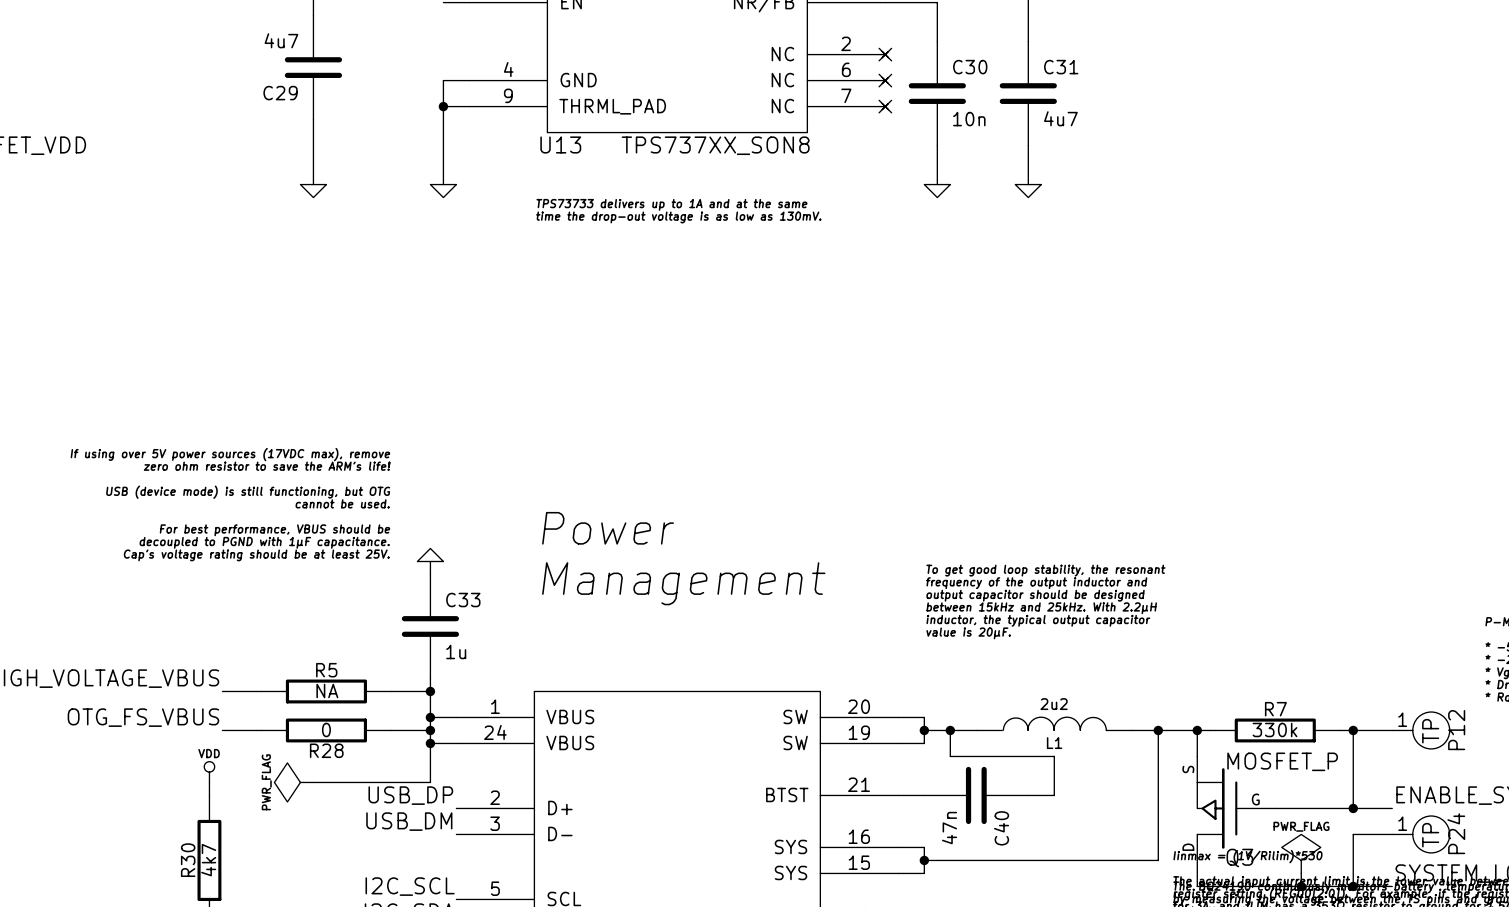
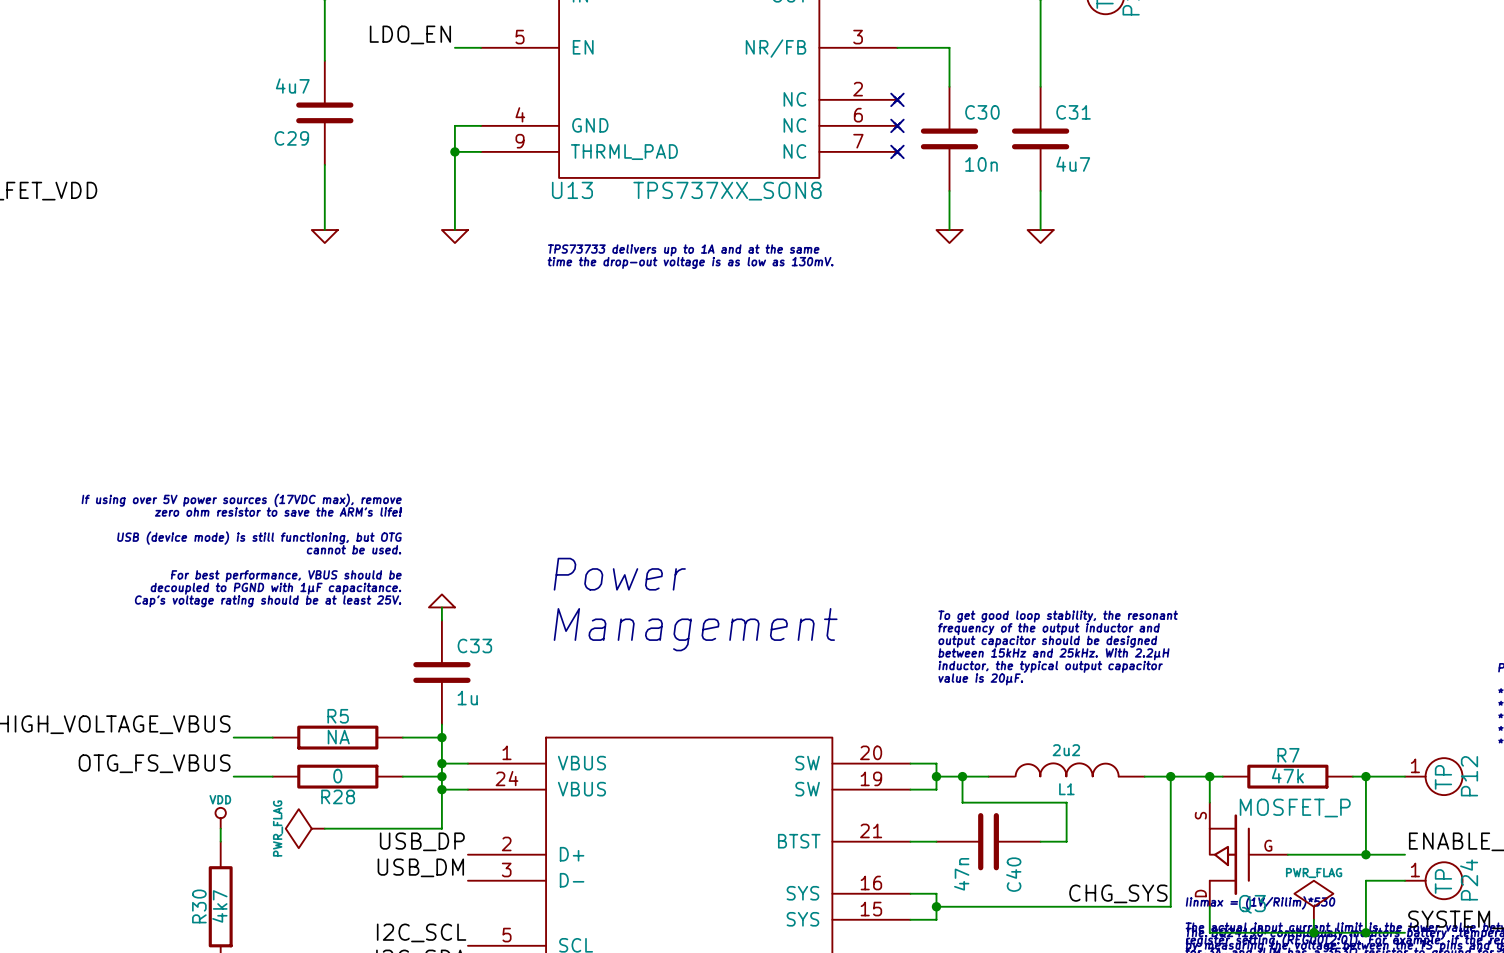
R7 value: 330k (1274, 729) -> 47k (1287, 775)
label: none -> CHG_SYS (1118, 893)

